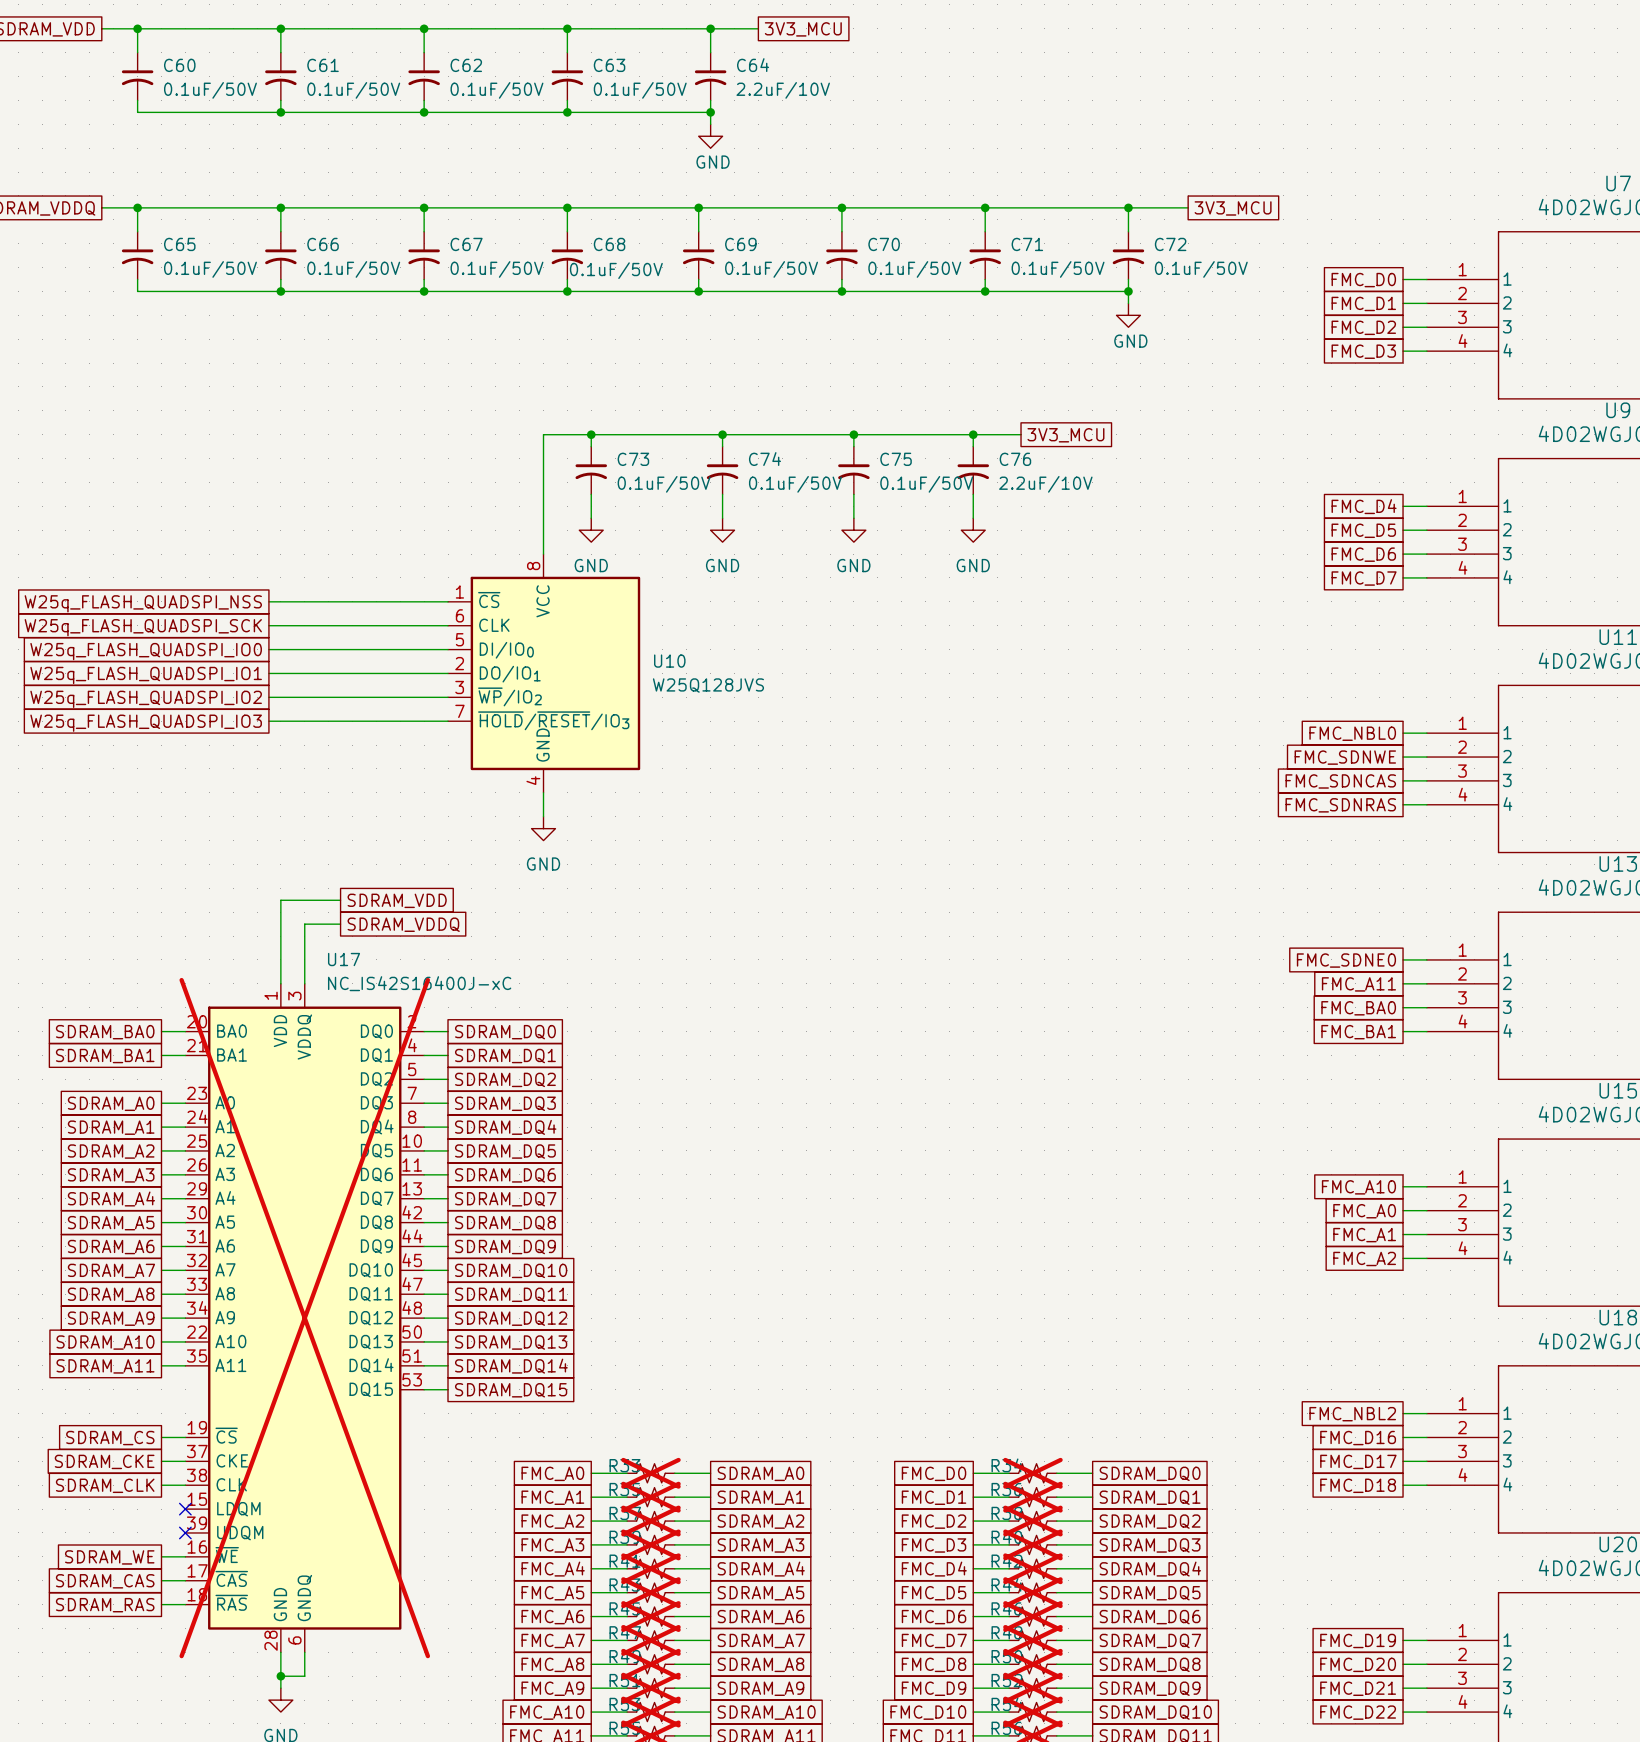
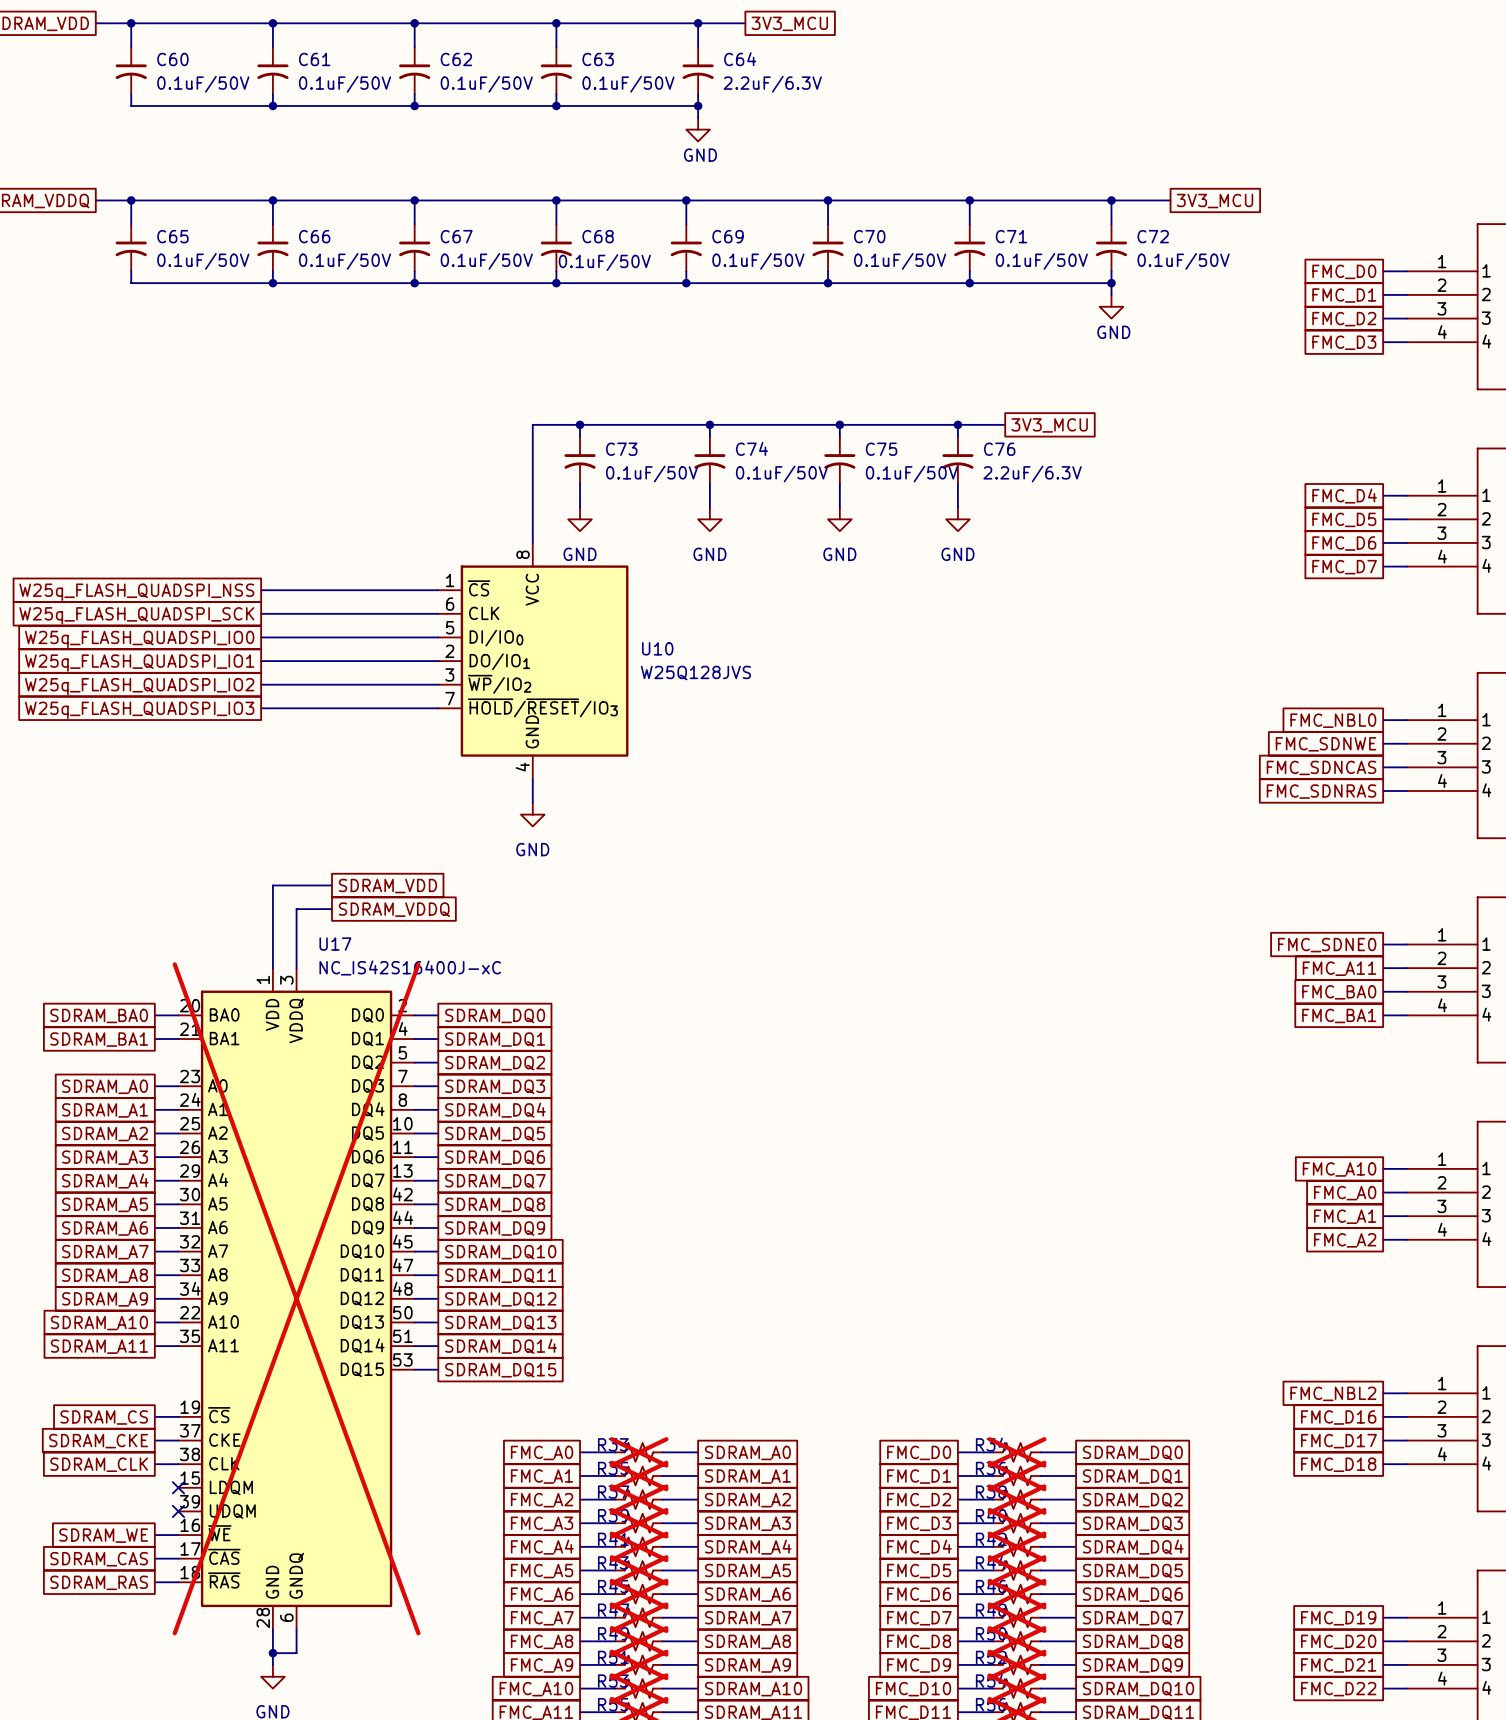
C64 value: 2.2uF/10V (783, 90) -> 2.2uF/6.3V (772, 84)
C76 value: 2.2uF/10V (1045, 484) -> 2.2uF/6.3V (1032, 473)

